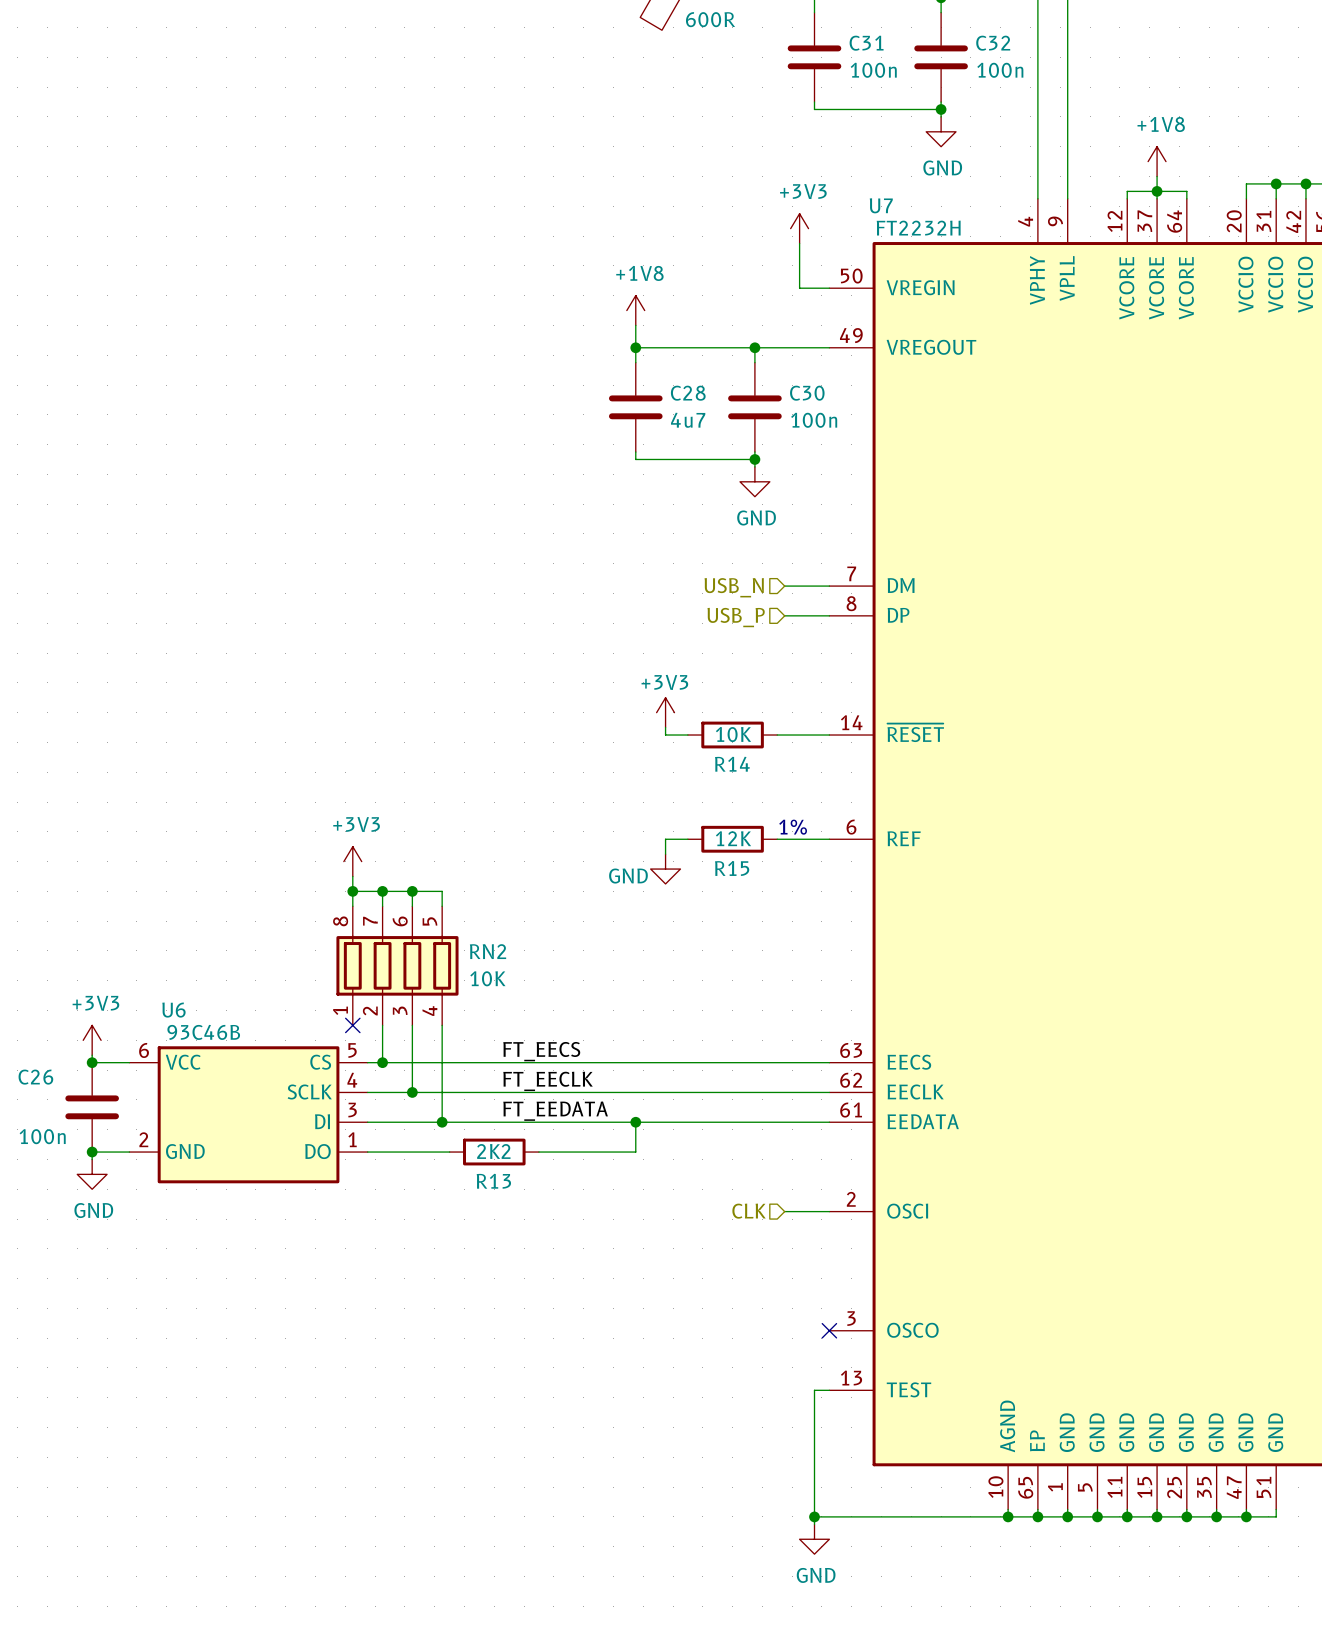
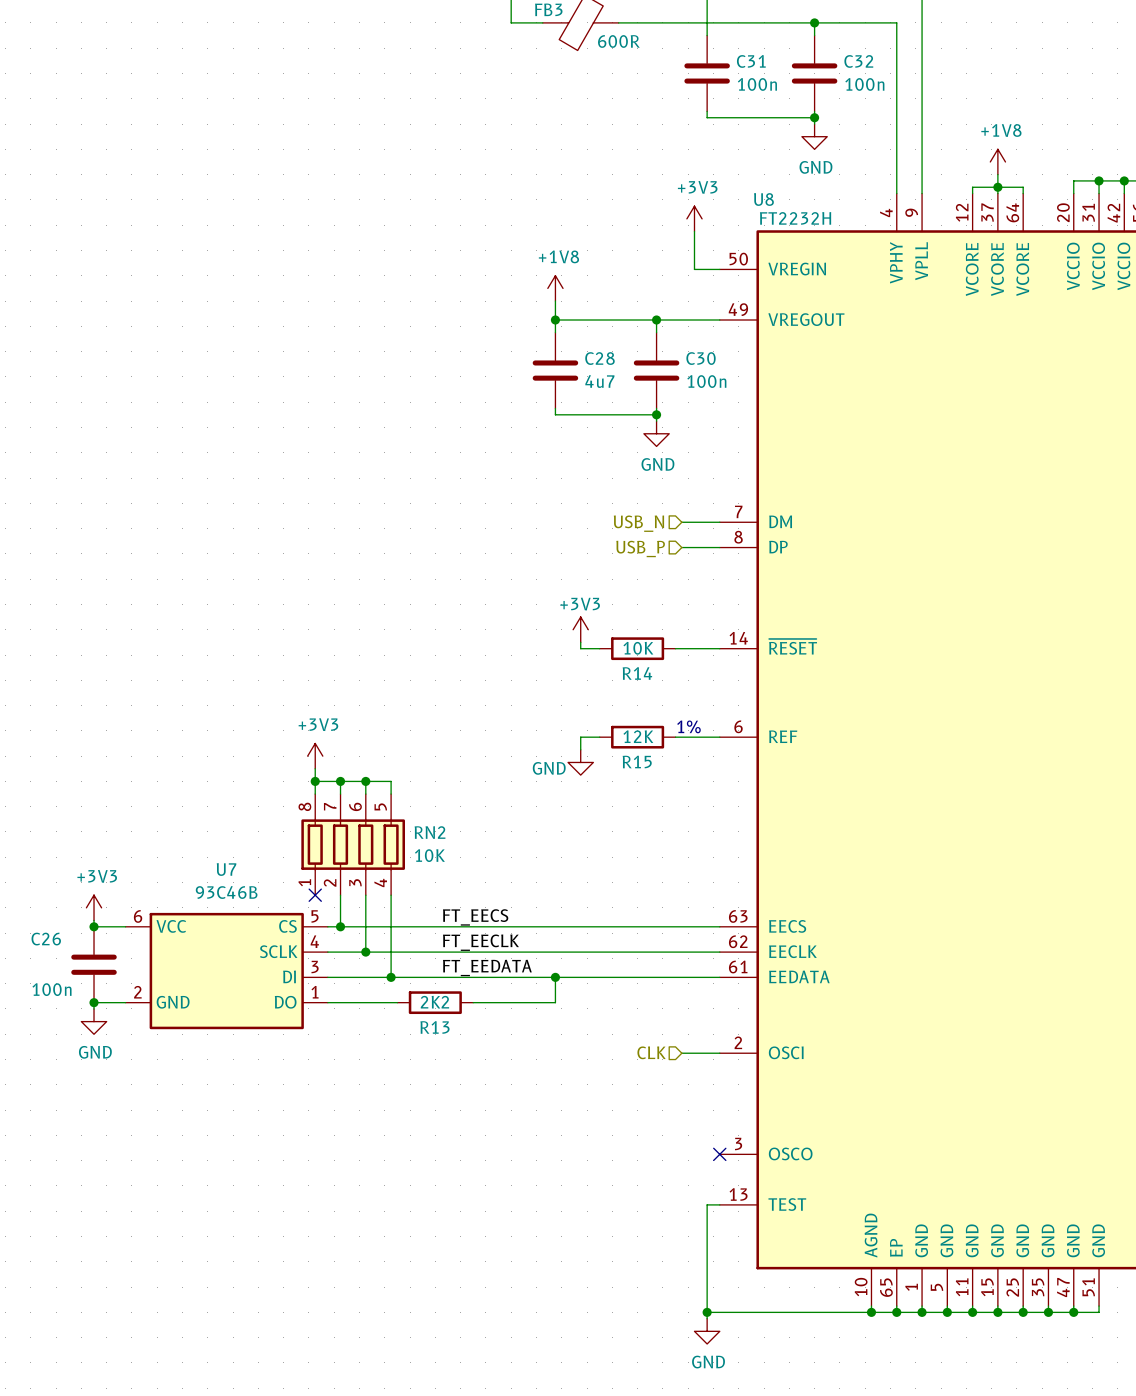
U7 name: U7 (881, 205) -> U8 (763, 199)
U6 name: U6 (173, 1010) -> U7 (226, 869)
U6 value position: 93C46B (203, 1032) -> 93C46B (226, 892)

